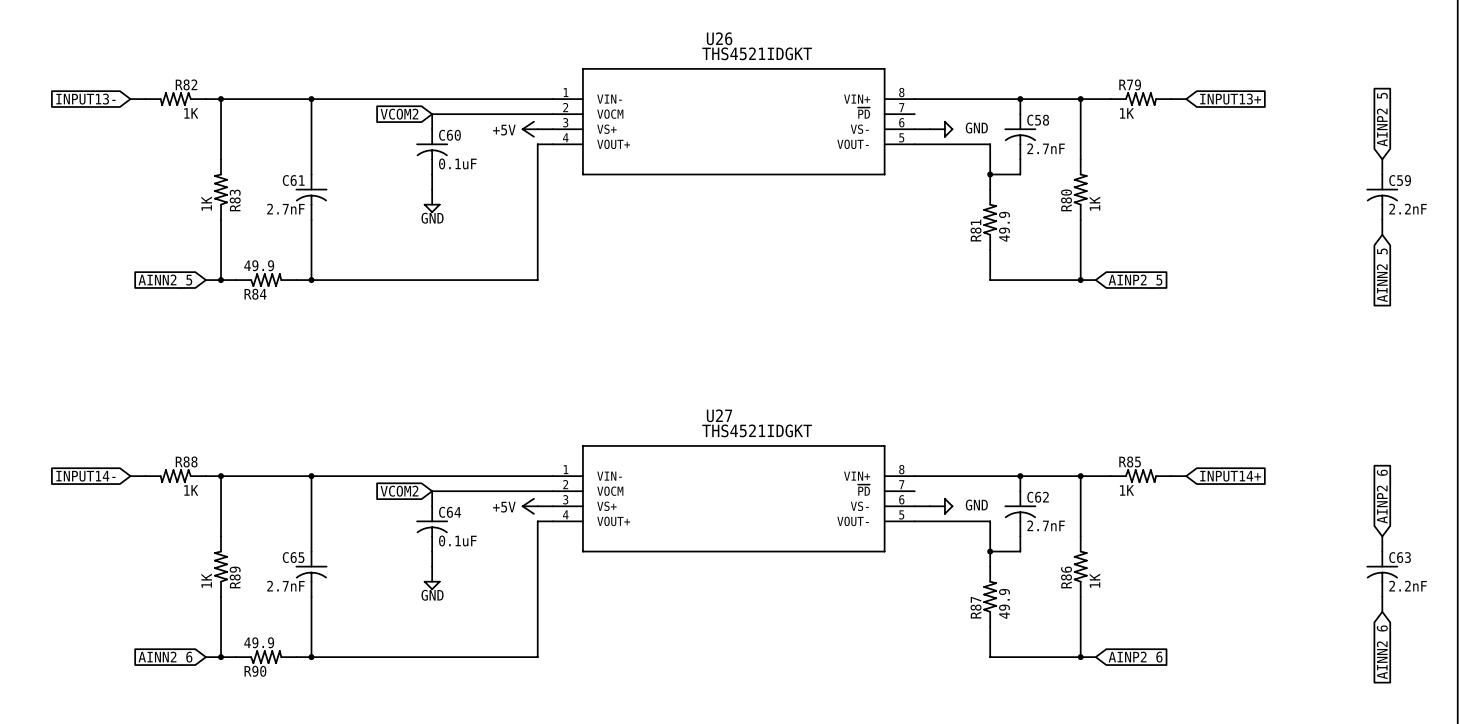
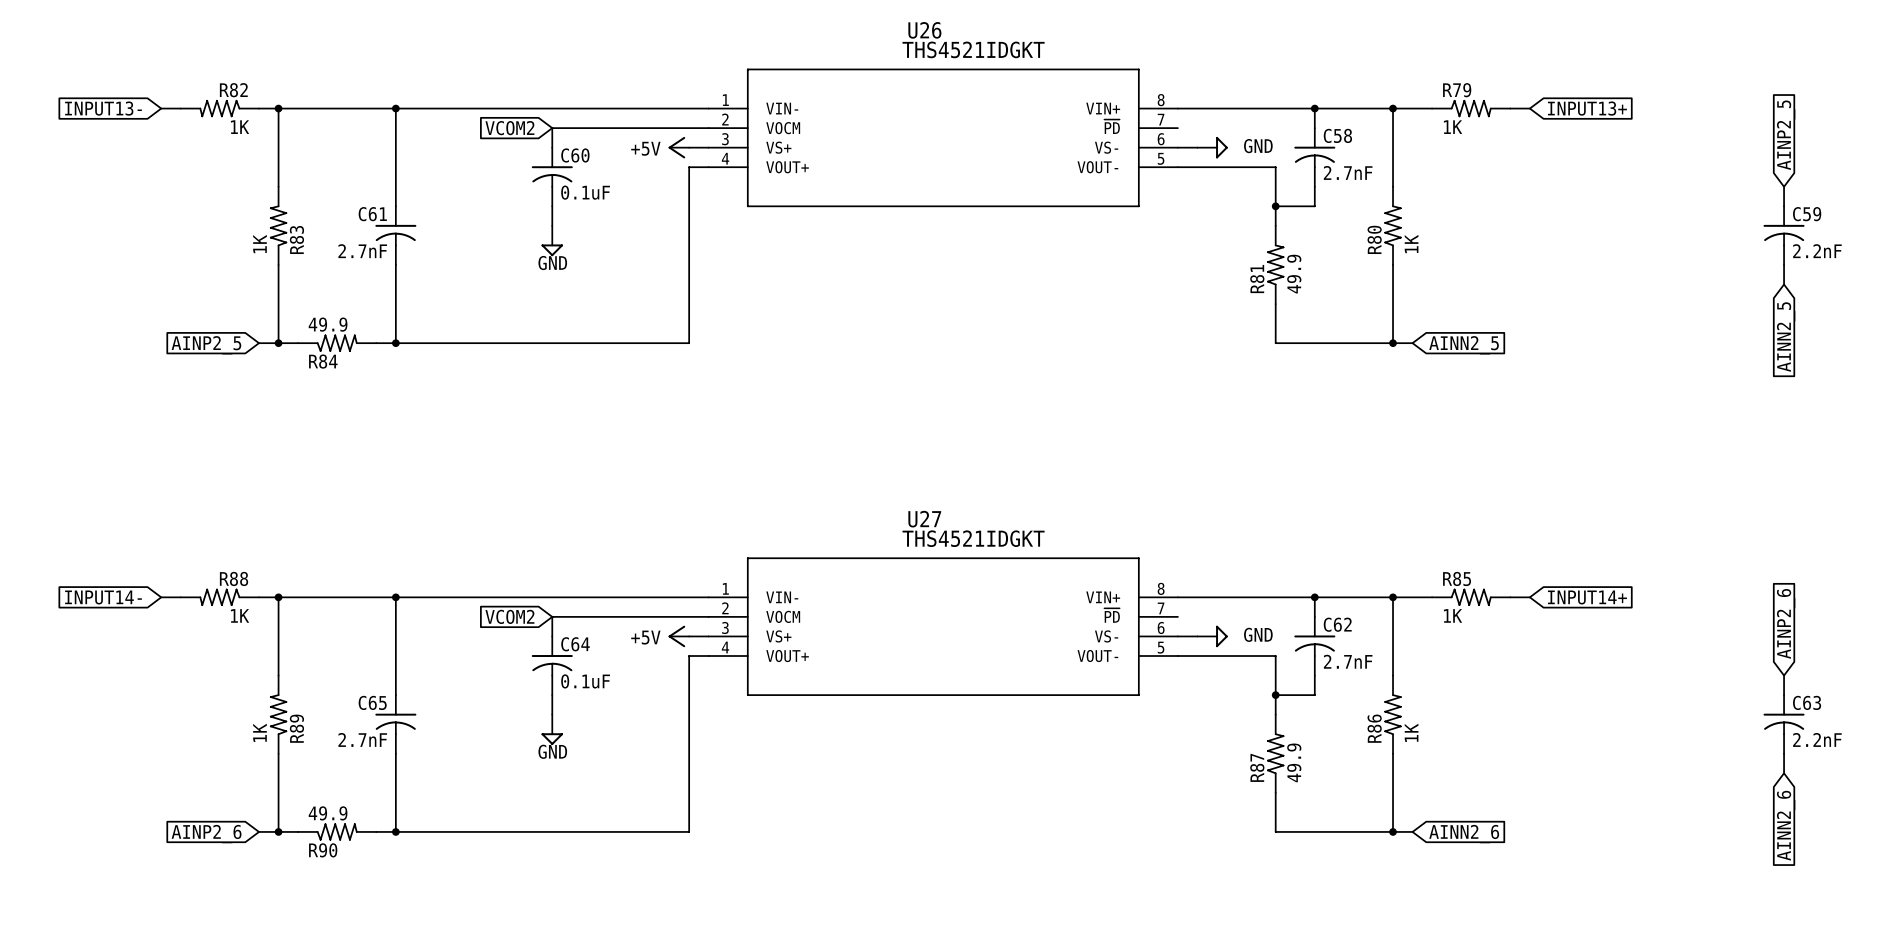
global label: AINN2_5 (165, 281) -> AINP2_5 (206, 345)
global label: AINP2_5 (1135, 281) -> AINN2_5 (1464, 345)
global label: AINN2_6 (165, 658) -> AINP2_6 (206, 834)
global label: AINP2_6 (1135, 658) -> AINN2_6 (1464, 834)

